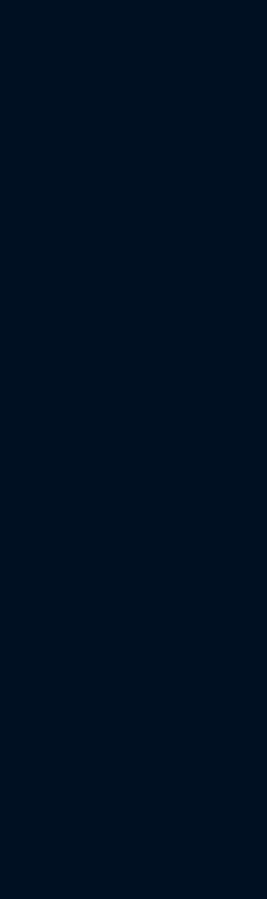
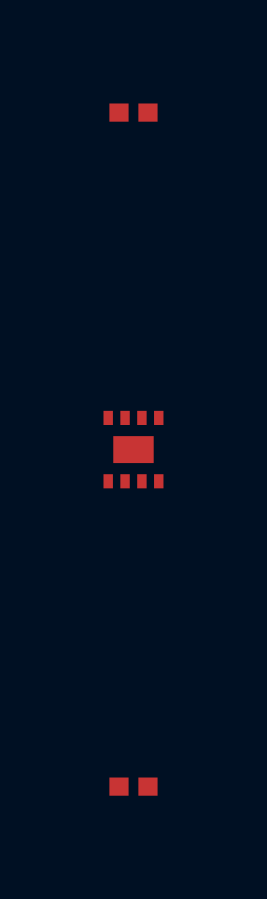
part: none -> (133, 112)
part: none -> (133, 449)
part: none -> (133, 786)

